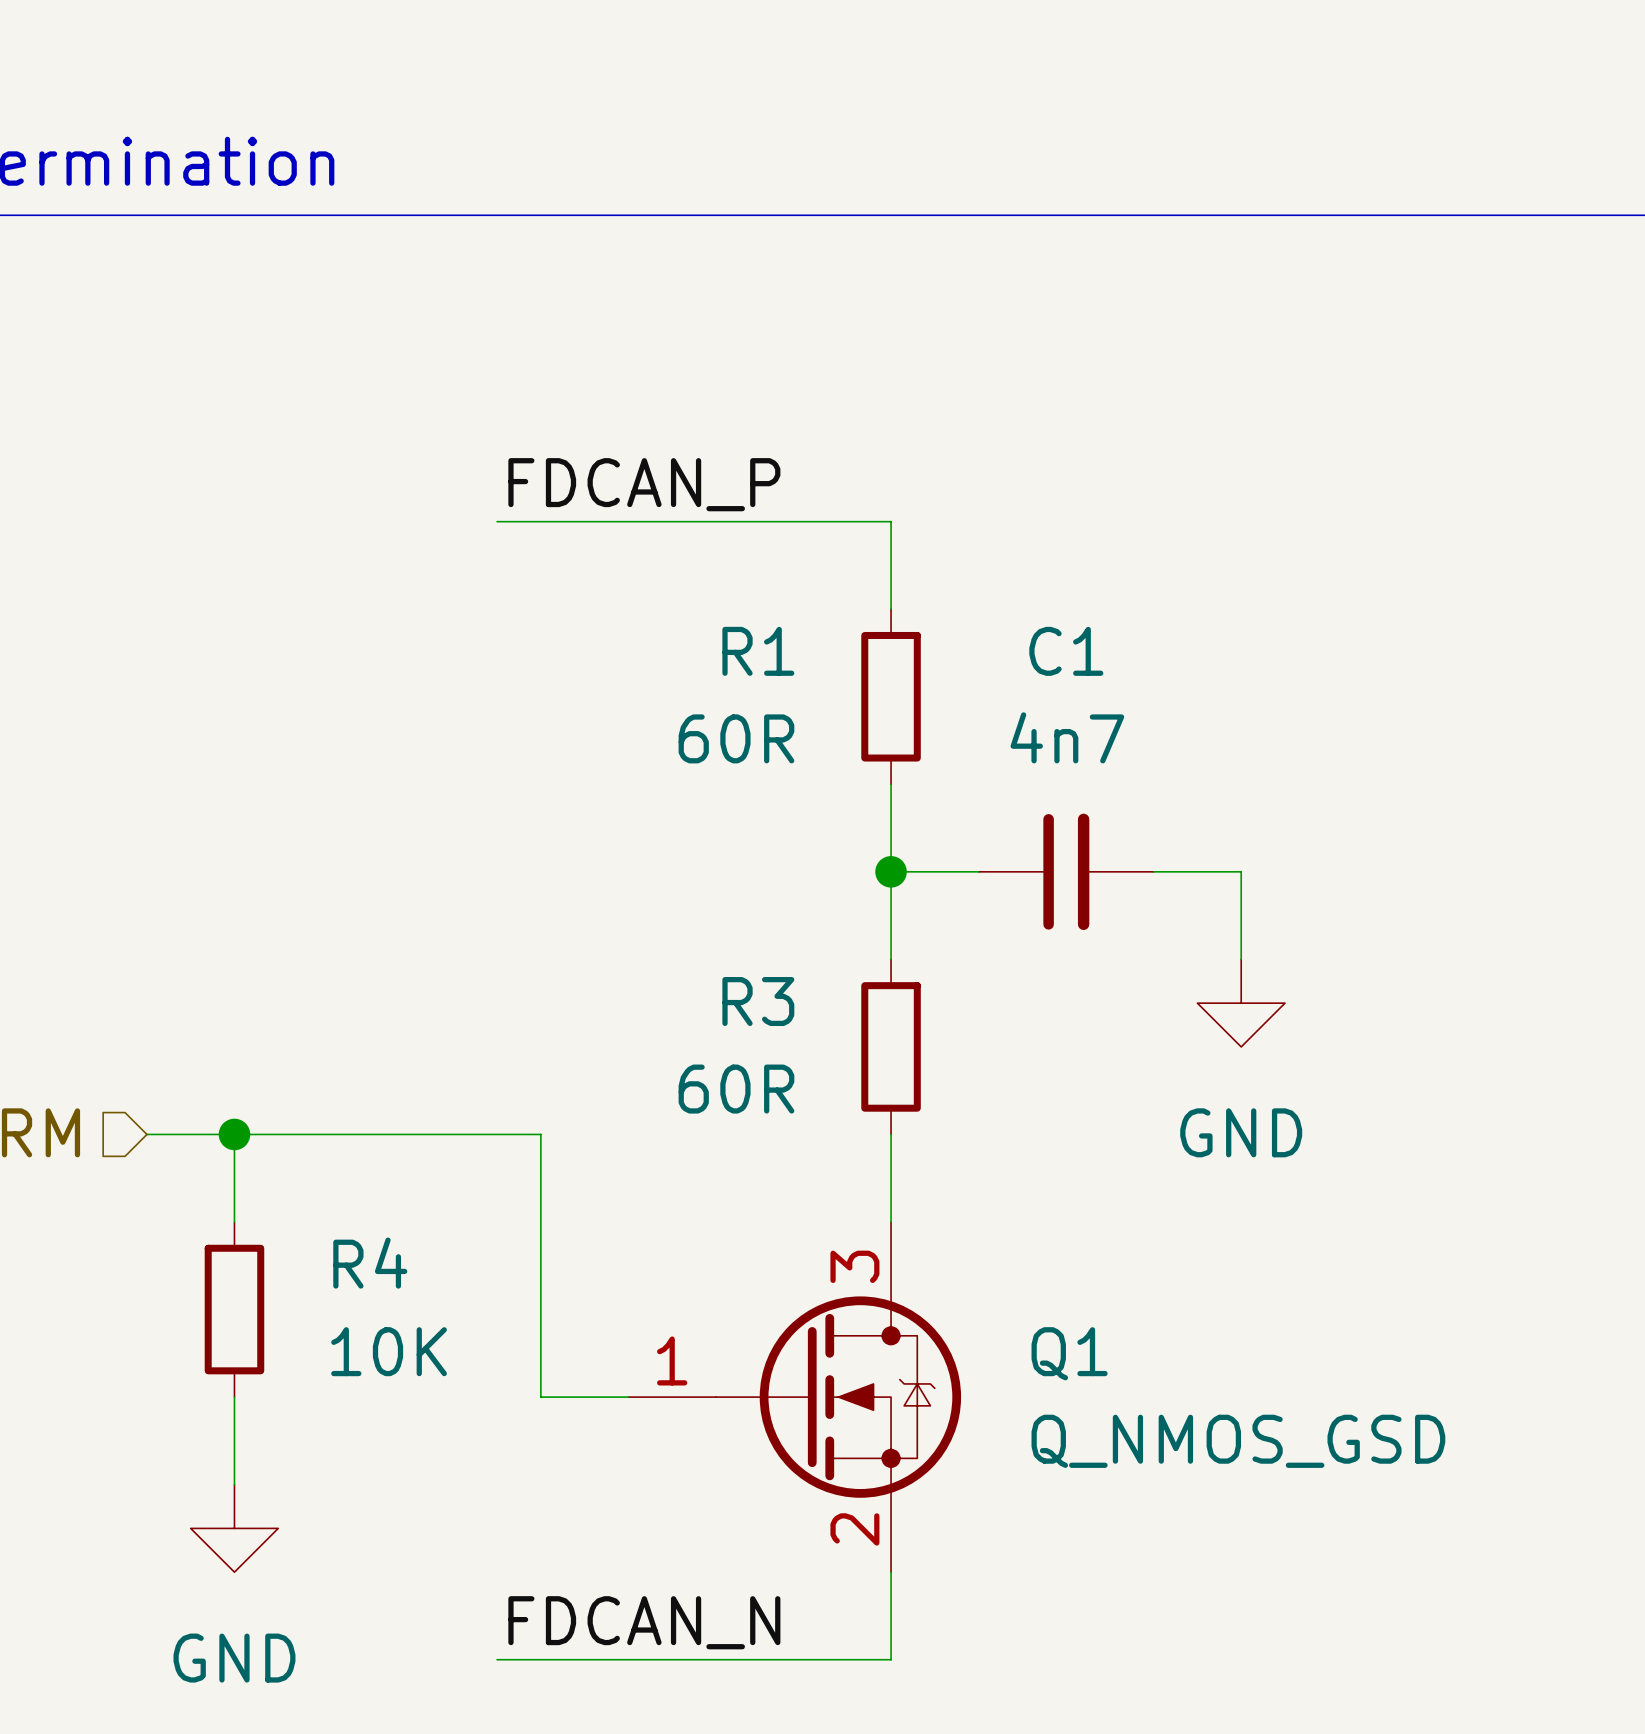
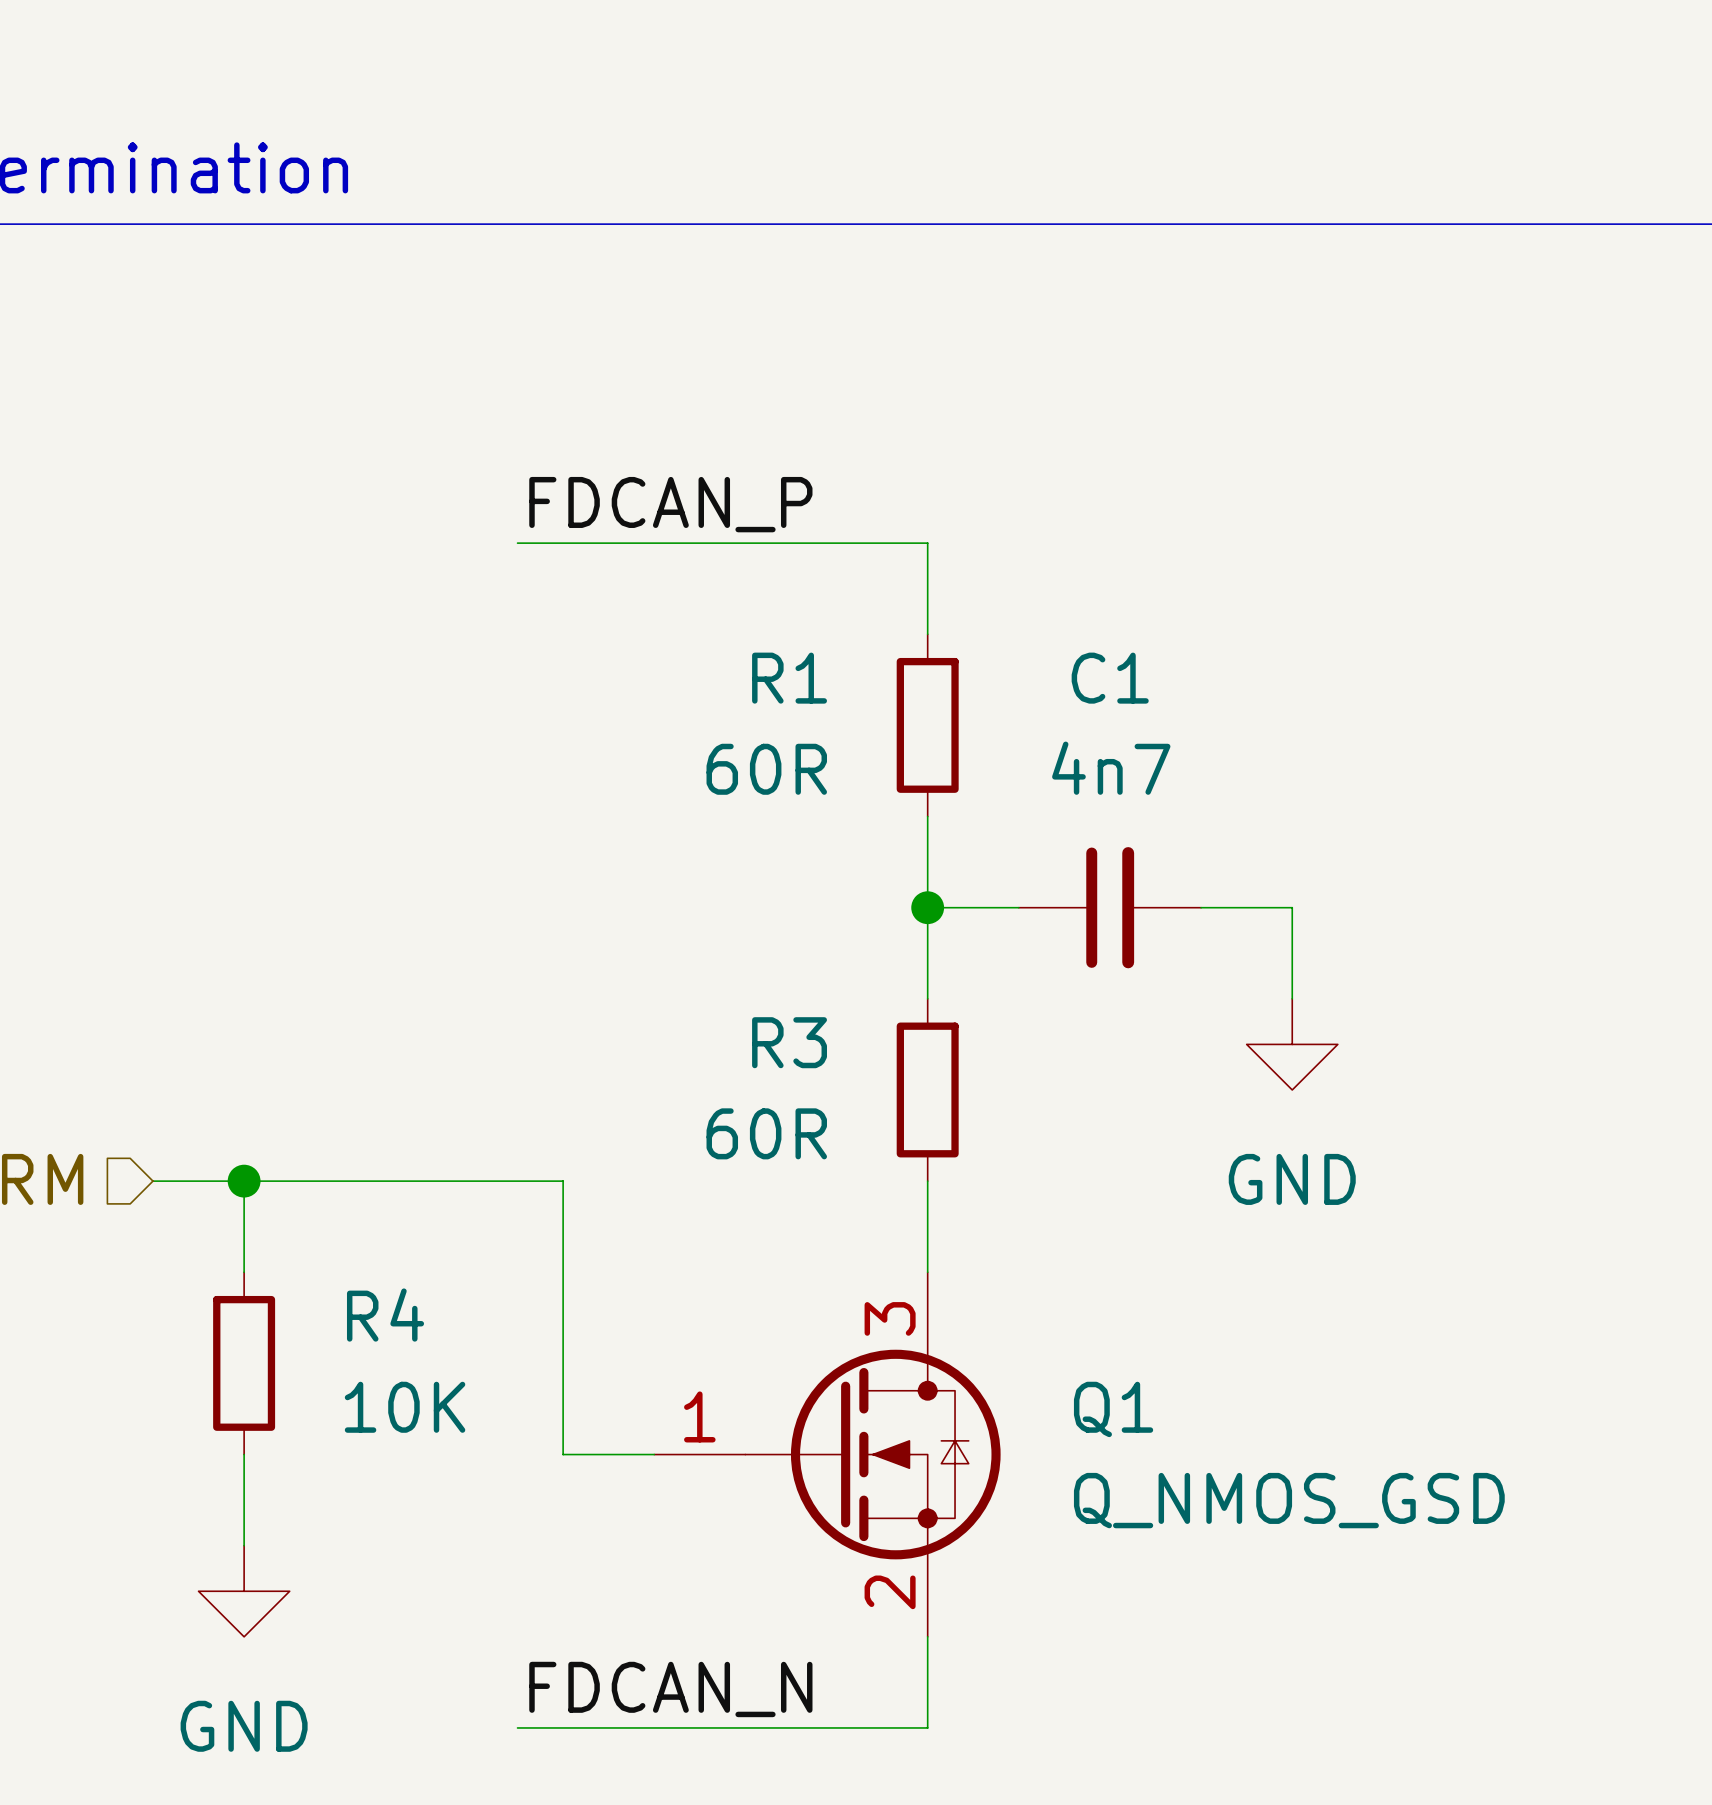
Q1 symbol: [628, 1222, 962, 1573] -> [654, 1272, 1001, 1637]

